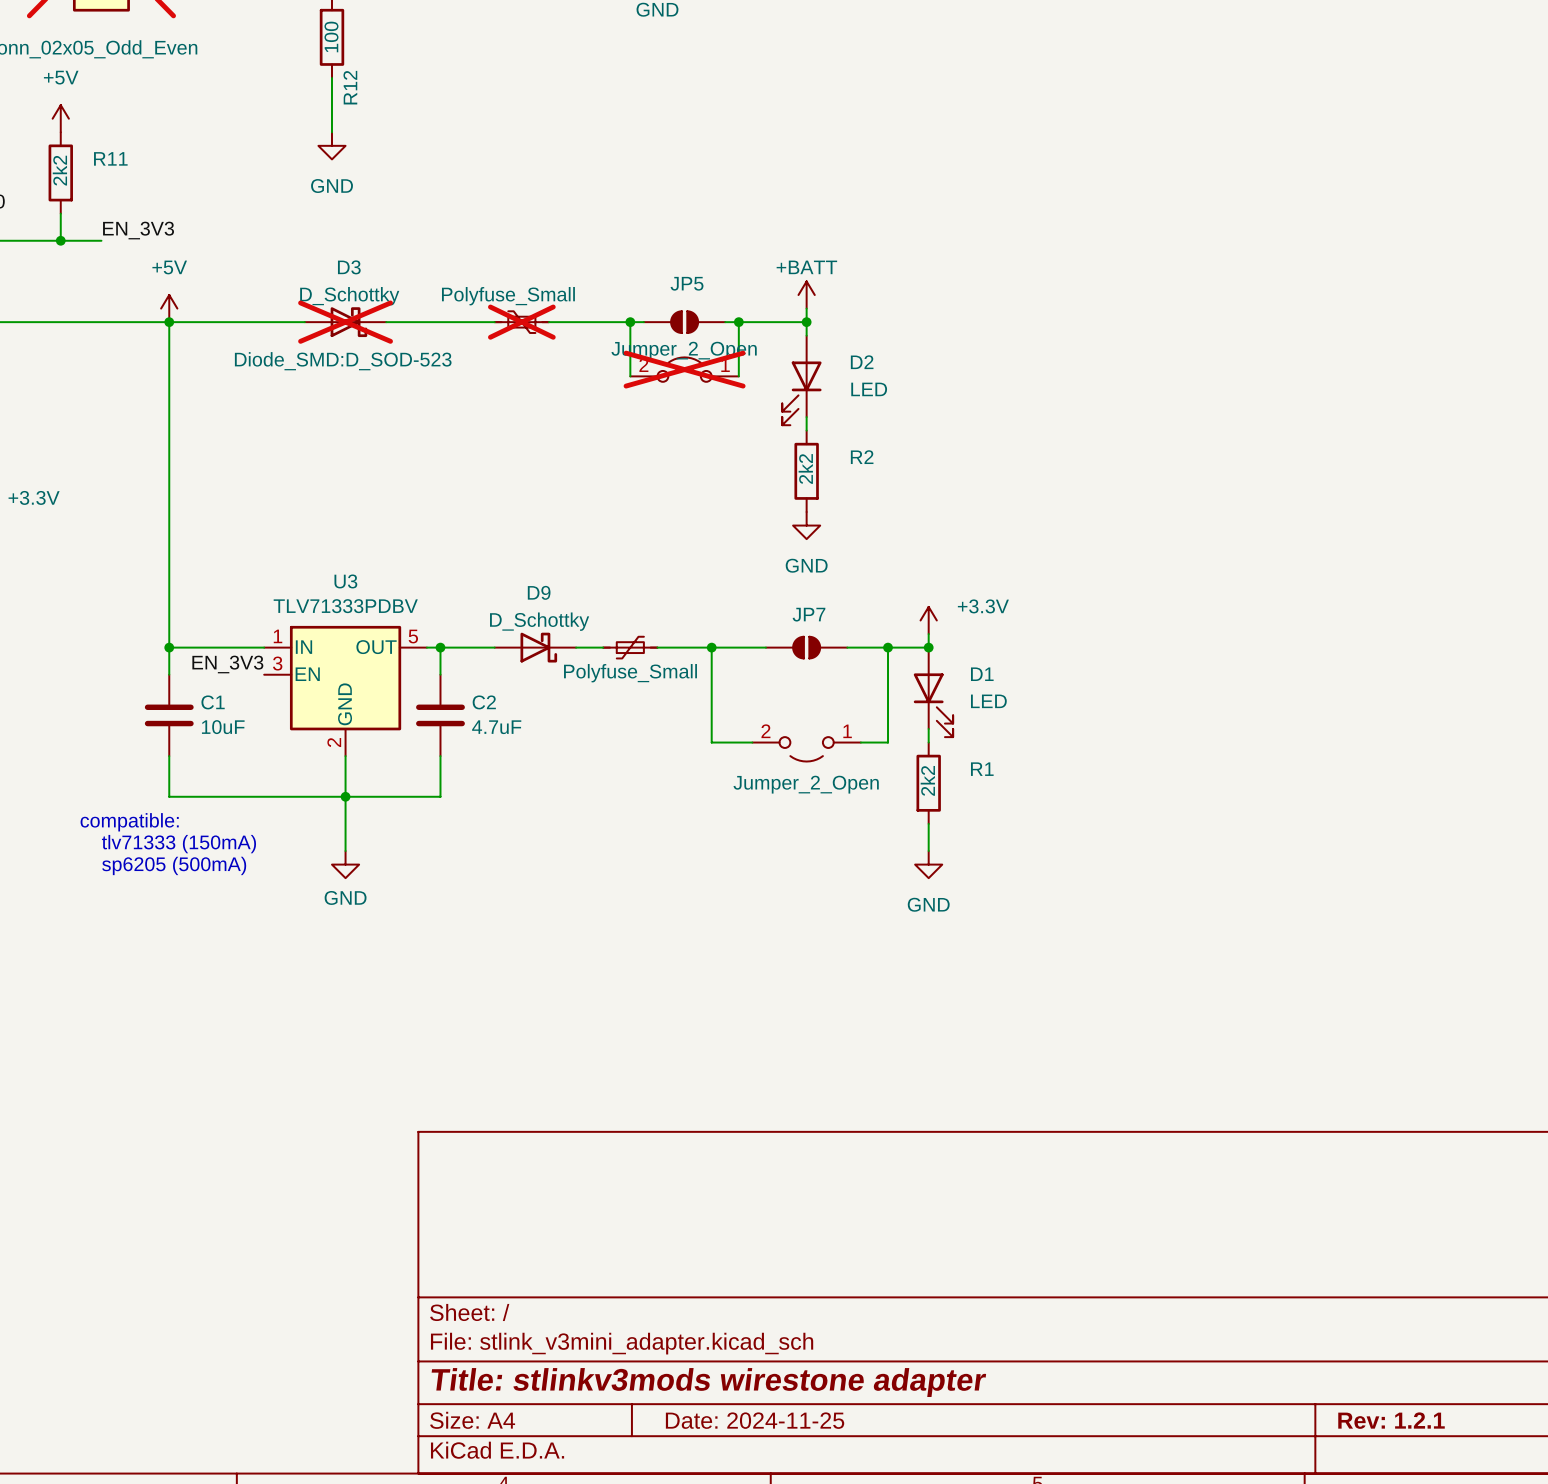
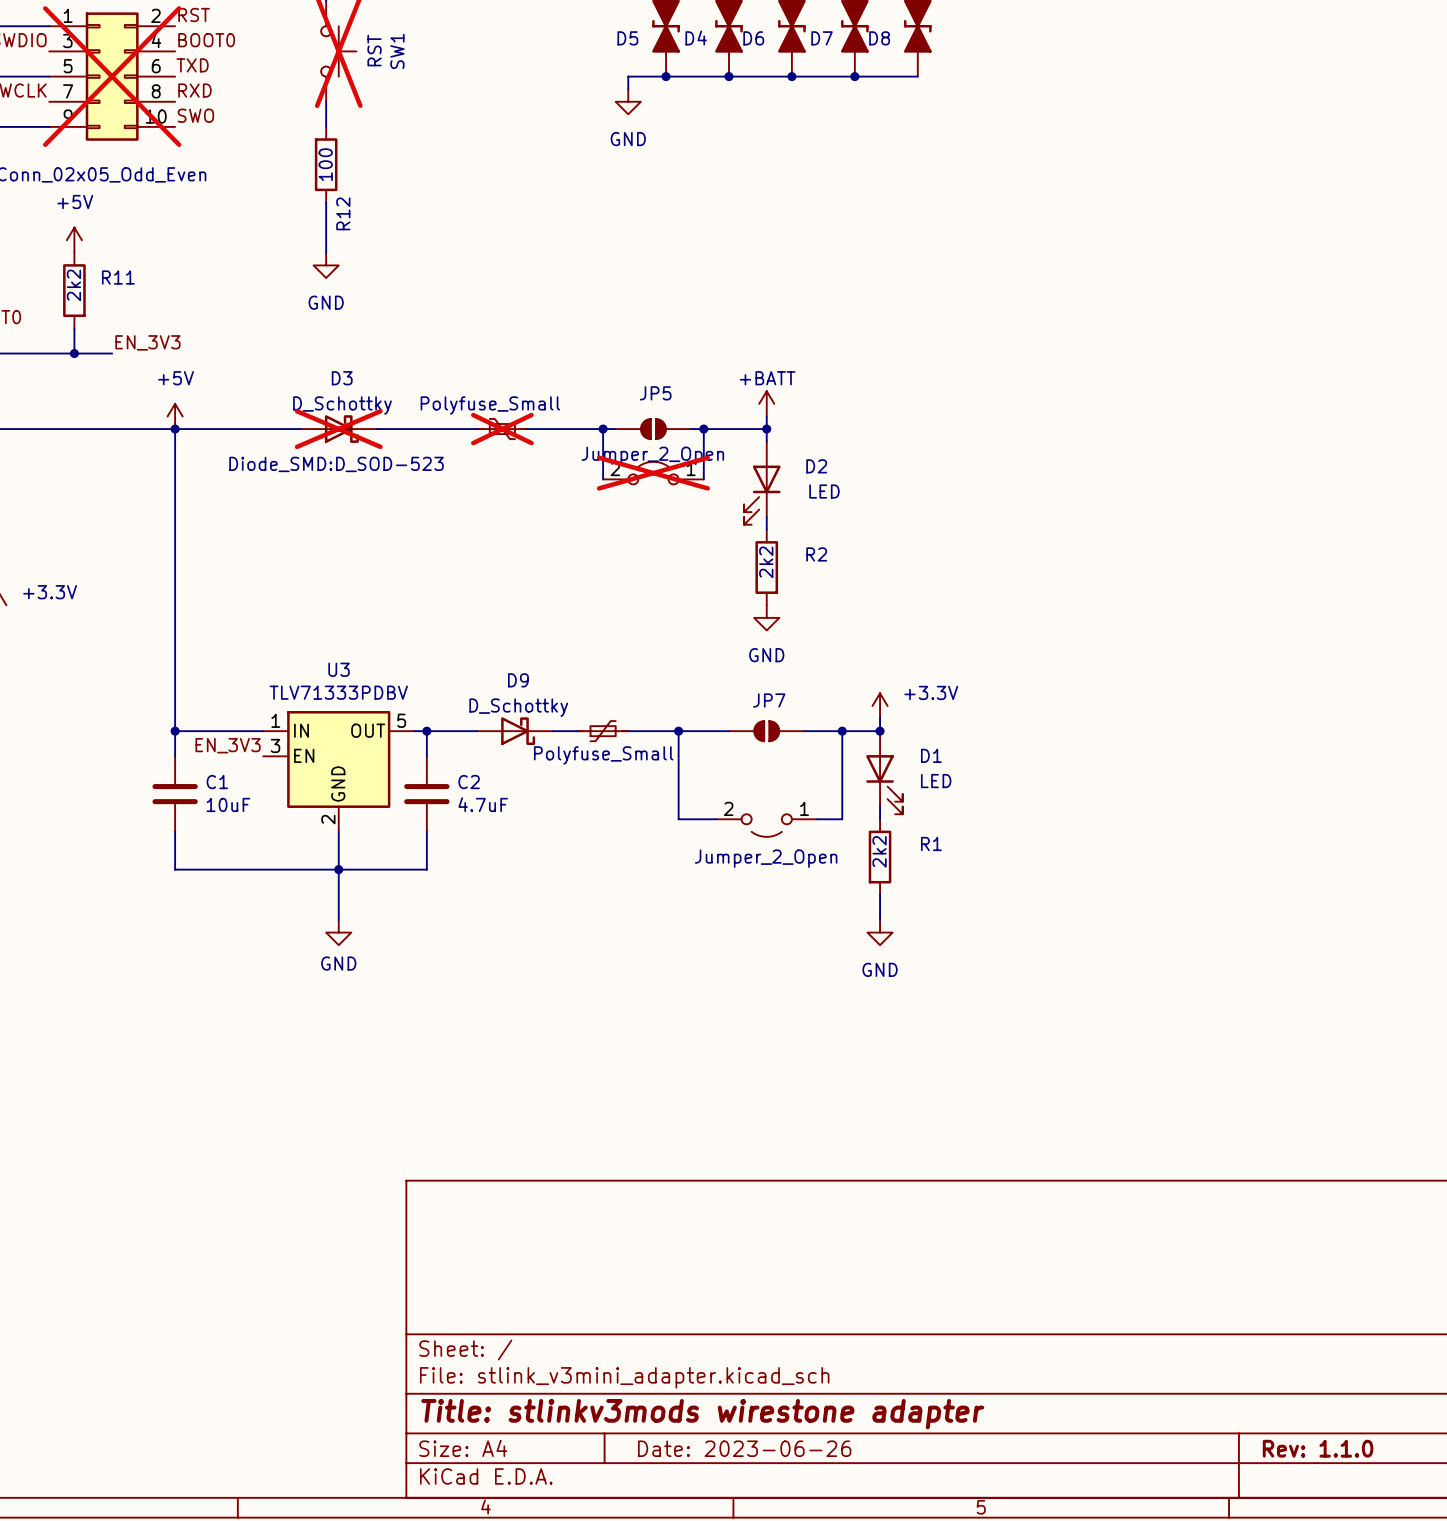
text: compatible: (129, 822) -> none
text: tlv71333 (150mA) (178, 844) -> none
text: sp6205 (500mA) (174, 865) -> none
title block: Date: 2024-11-25 (755, 1420) -> Date: 2023-06-26 (744, 1448)
title block: Rev: 1.2.1 (1391, 1420) -> Rev: 1.1.0 (1318, 1448)

